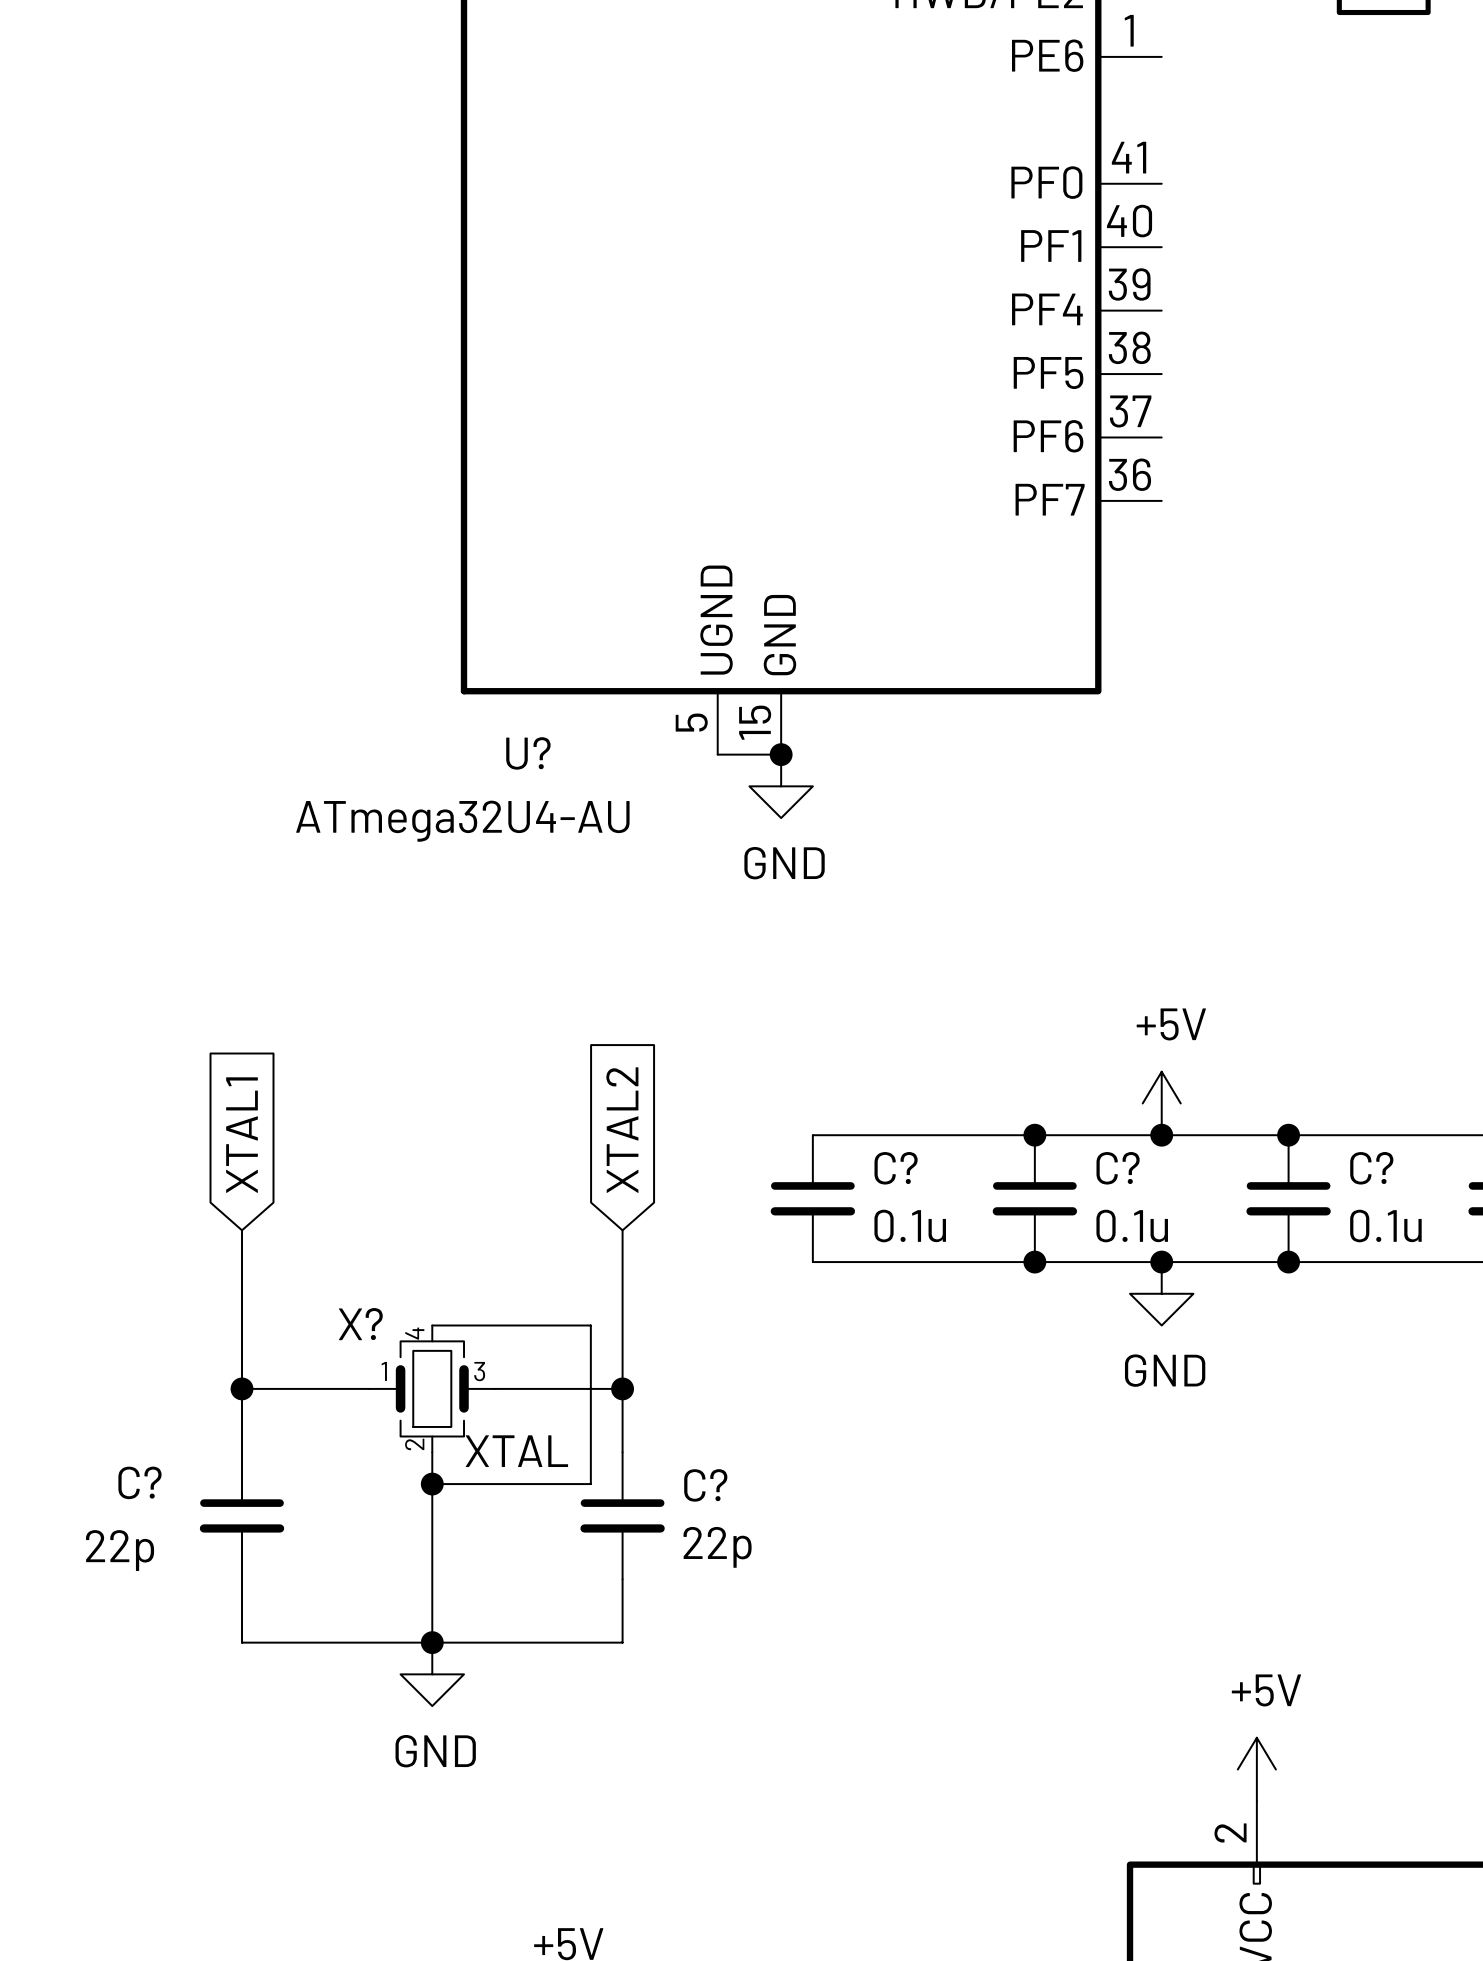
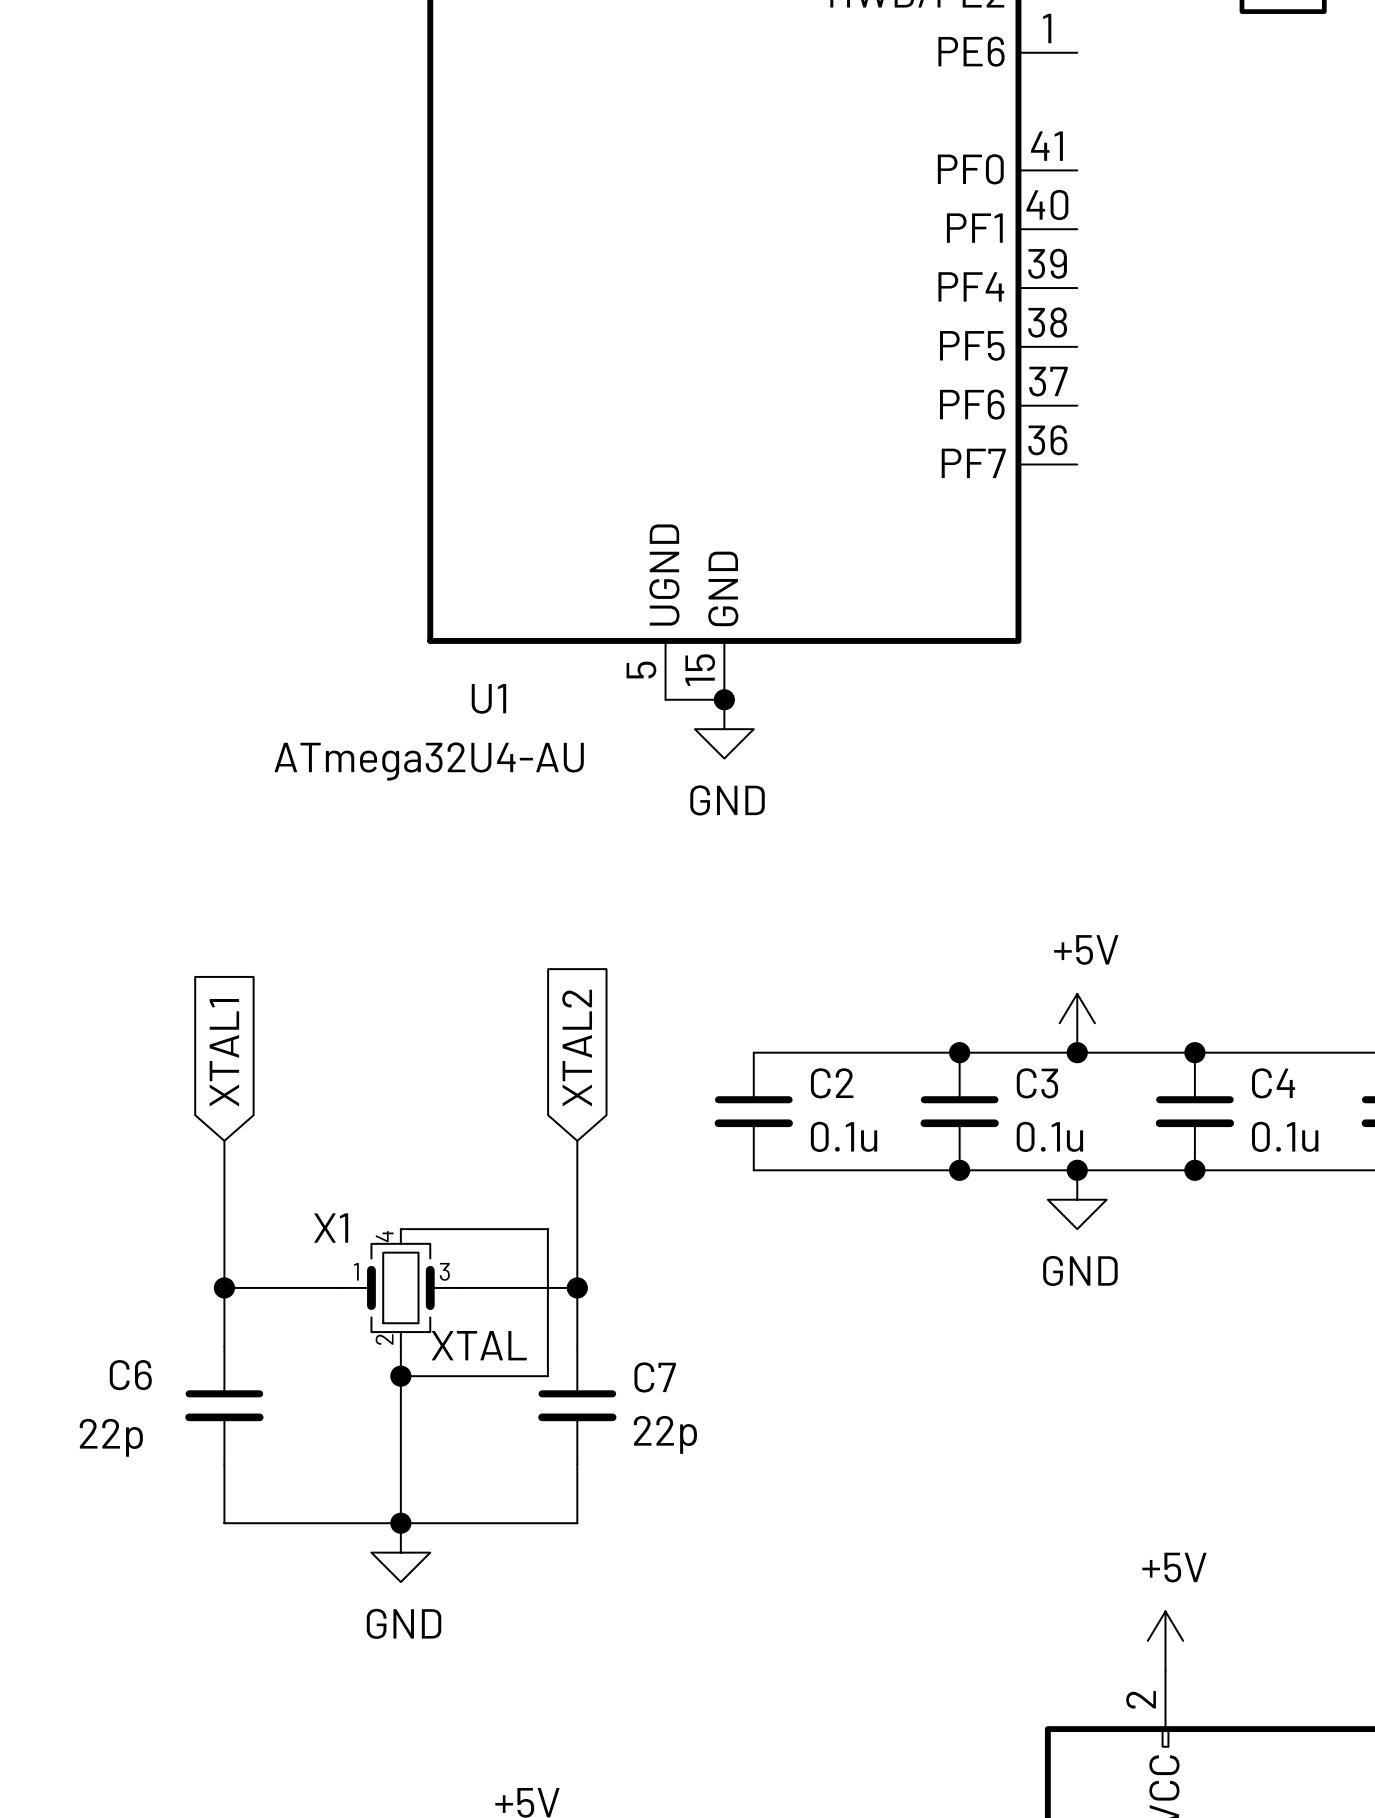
U? name: U? (528, 753) -> U1 (488, 698)
C? name: C? (896, 1168) -> C2 (832, 1083)
C? name: C? (1118, 1168) -> C3 (1037, 1083)
C? name: C? (1371, 1168) -> C4 (1273, 1083)
X? name: X? (360, 1324) -> X1 (331, 1228)
C? name: C? (139, 1482) -> C6 (130, 1375)
C? name: C? (705, 1485) -> C7 (655, 1377)

